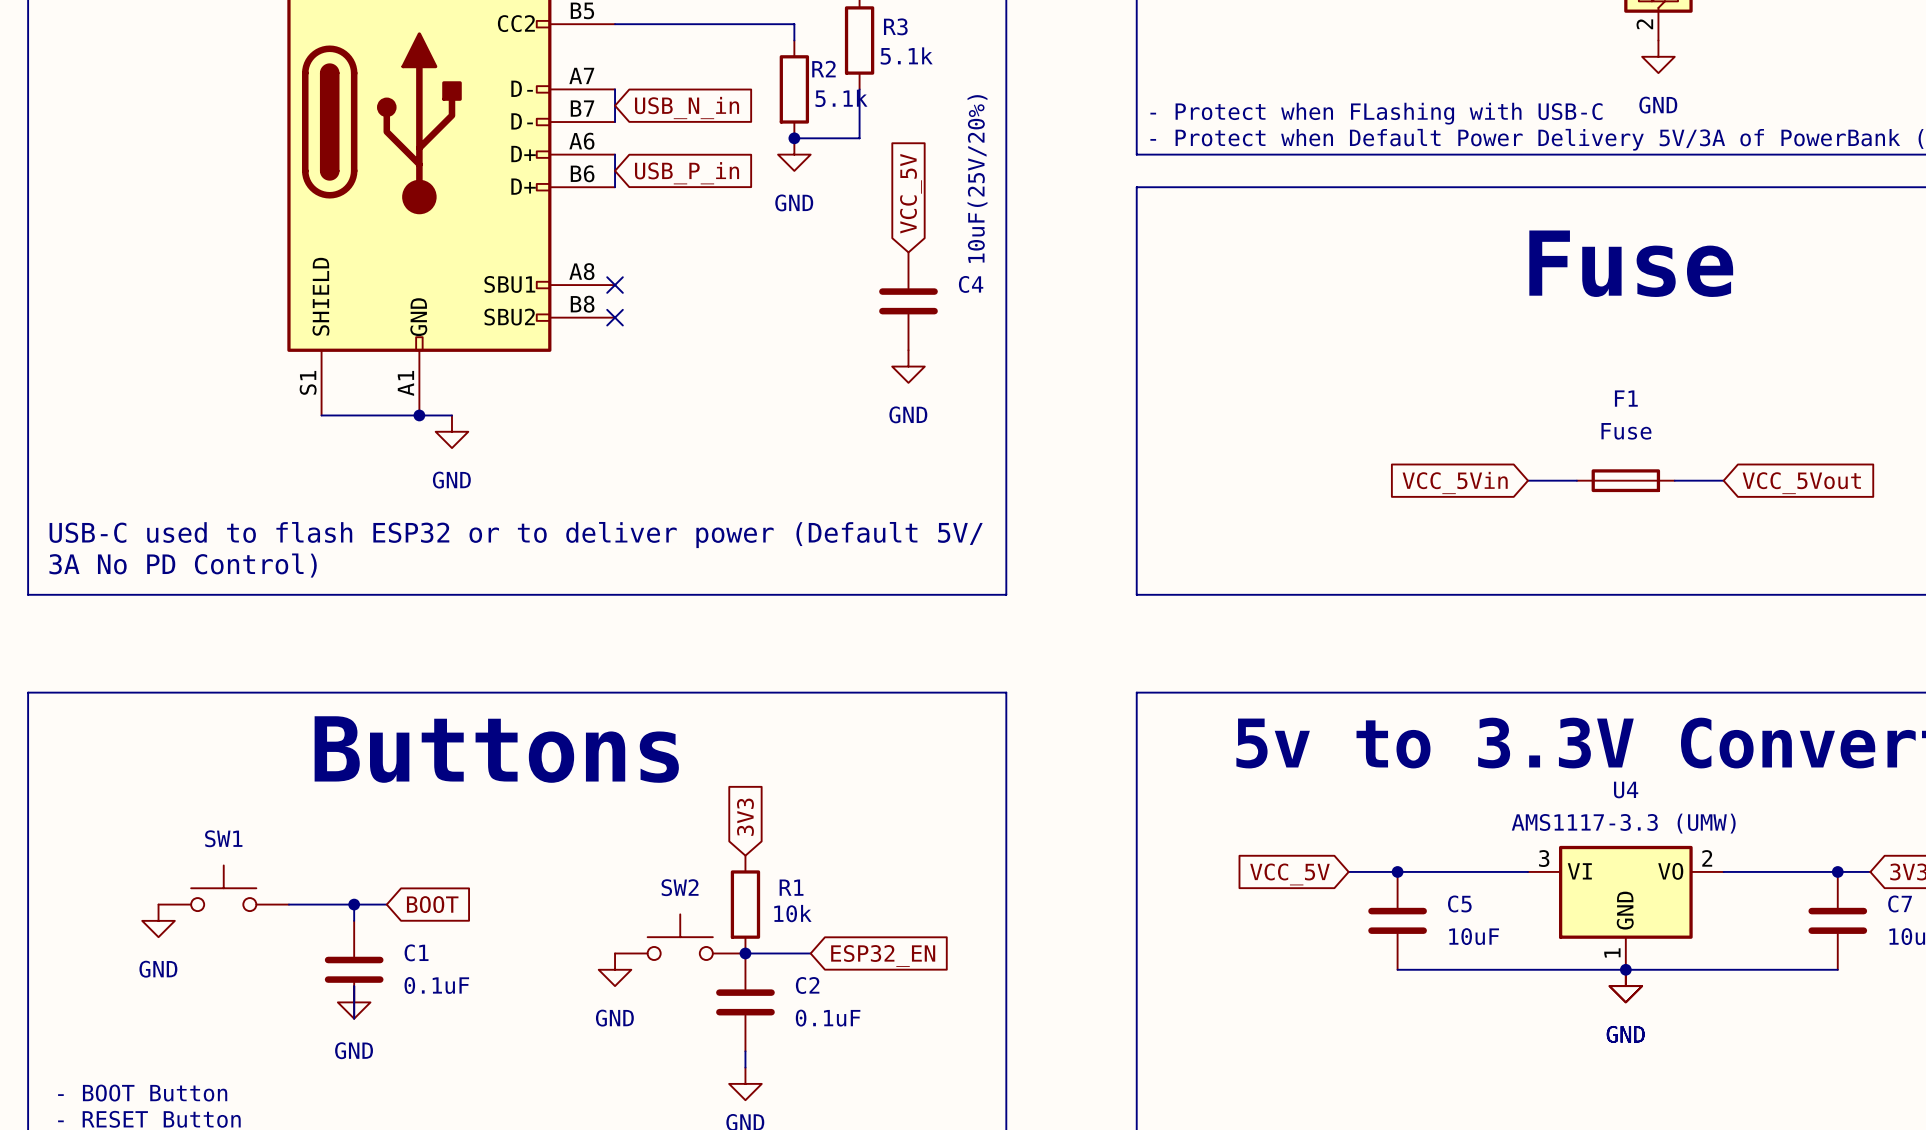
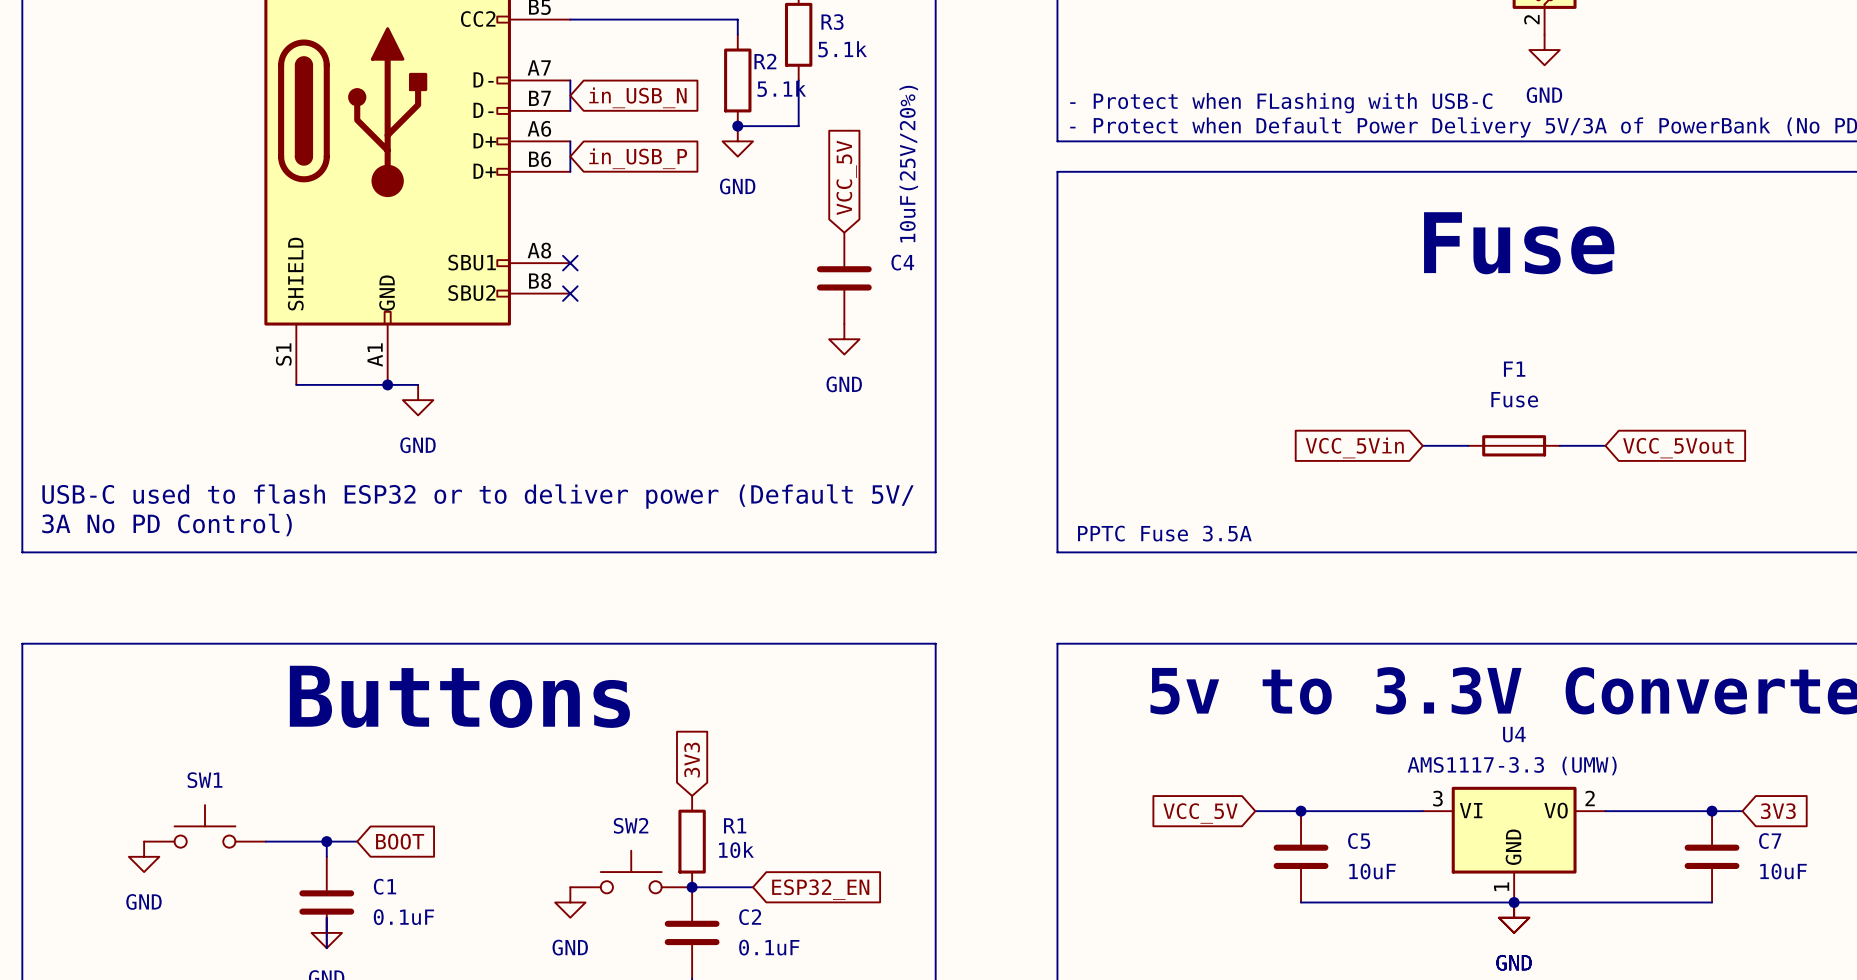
global label: USB_N_in (687, 108) -> in_USB_N (637, 97)
global label: USB_P_in (687, 173) -> in_USB_P (638, 158)
text: none -> PPTC Fuse 3.5A (1164, 533)

